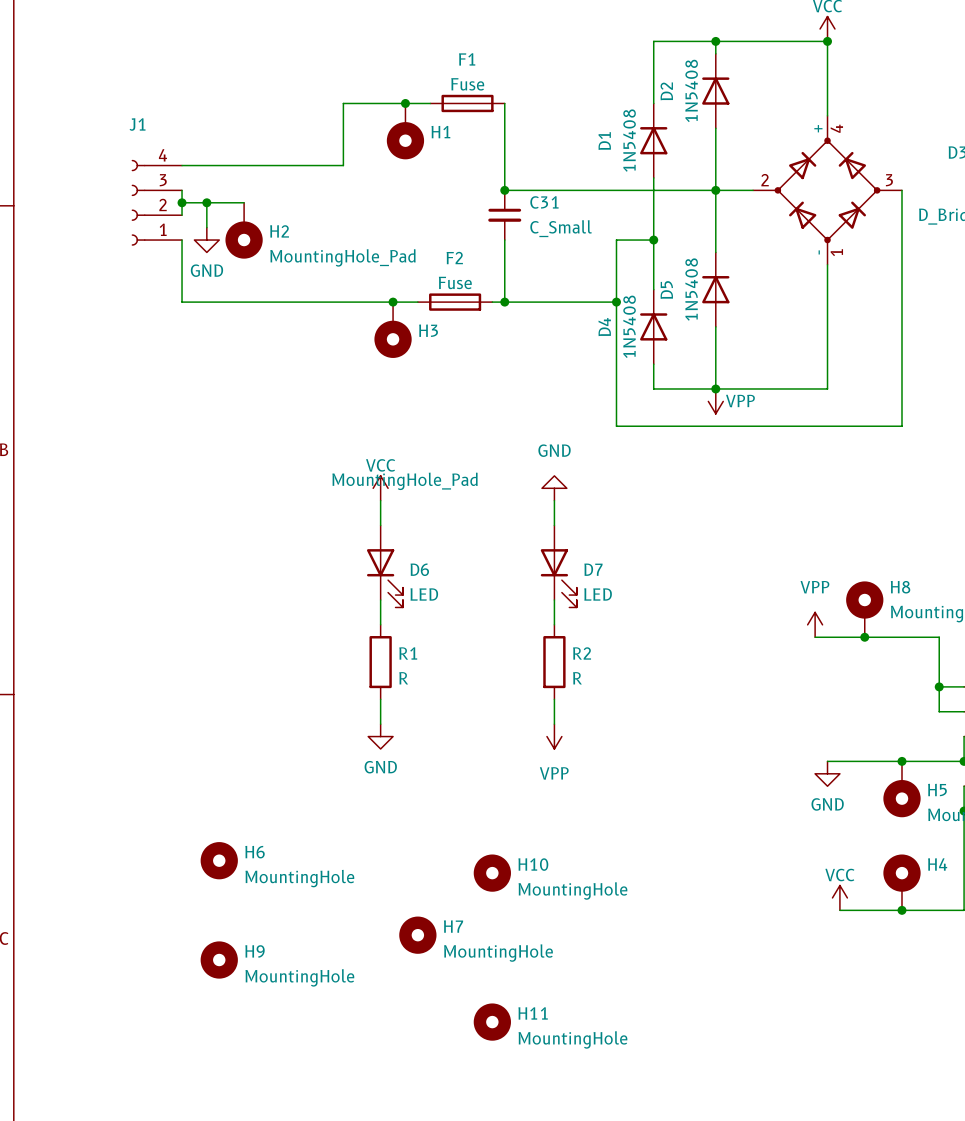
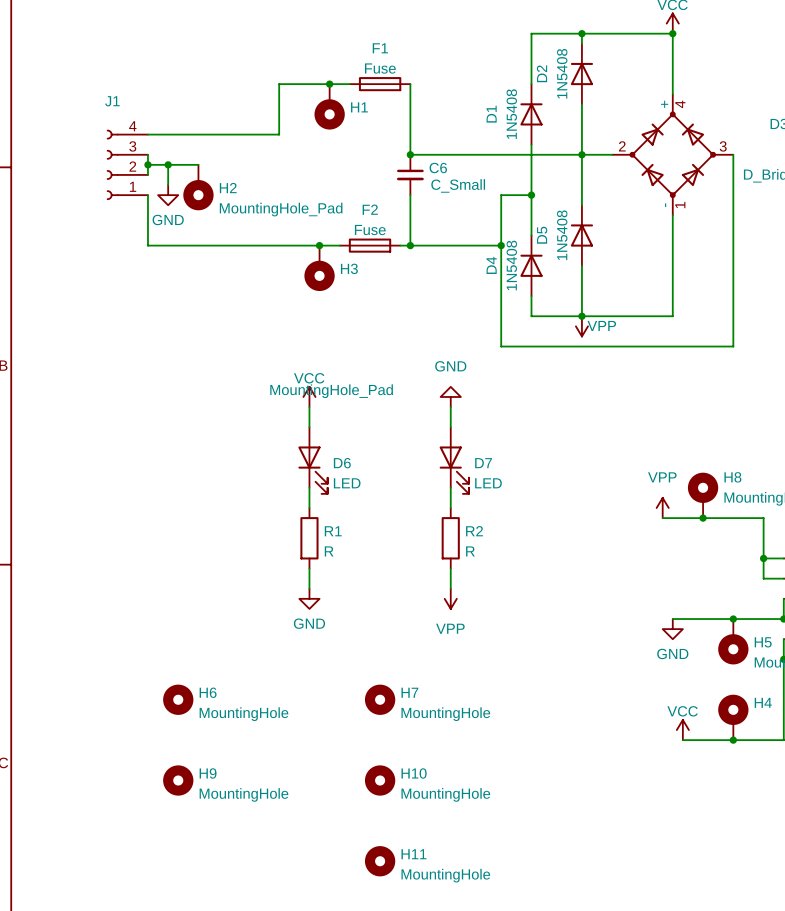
C31 name: C31 (544, 202) -> C6 (438, 167)
H10 position: (492, 873) -> (380, 780)
H7 position: (417, 935) -> (380, 699)
H11 position: (492, 1022) -> (380, 861)

